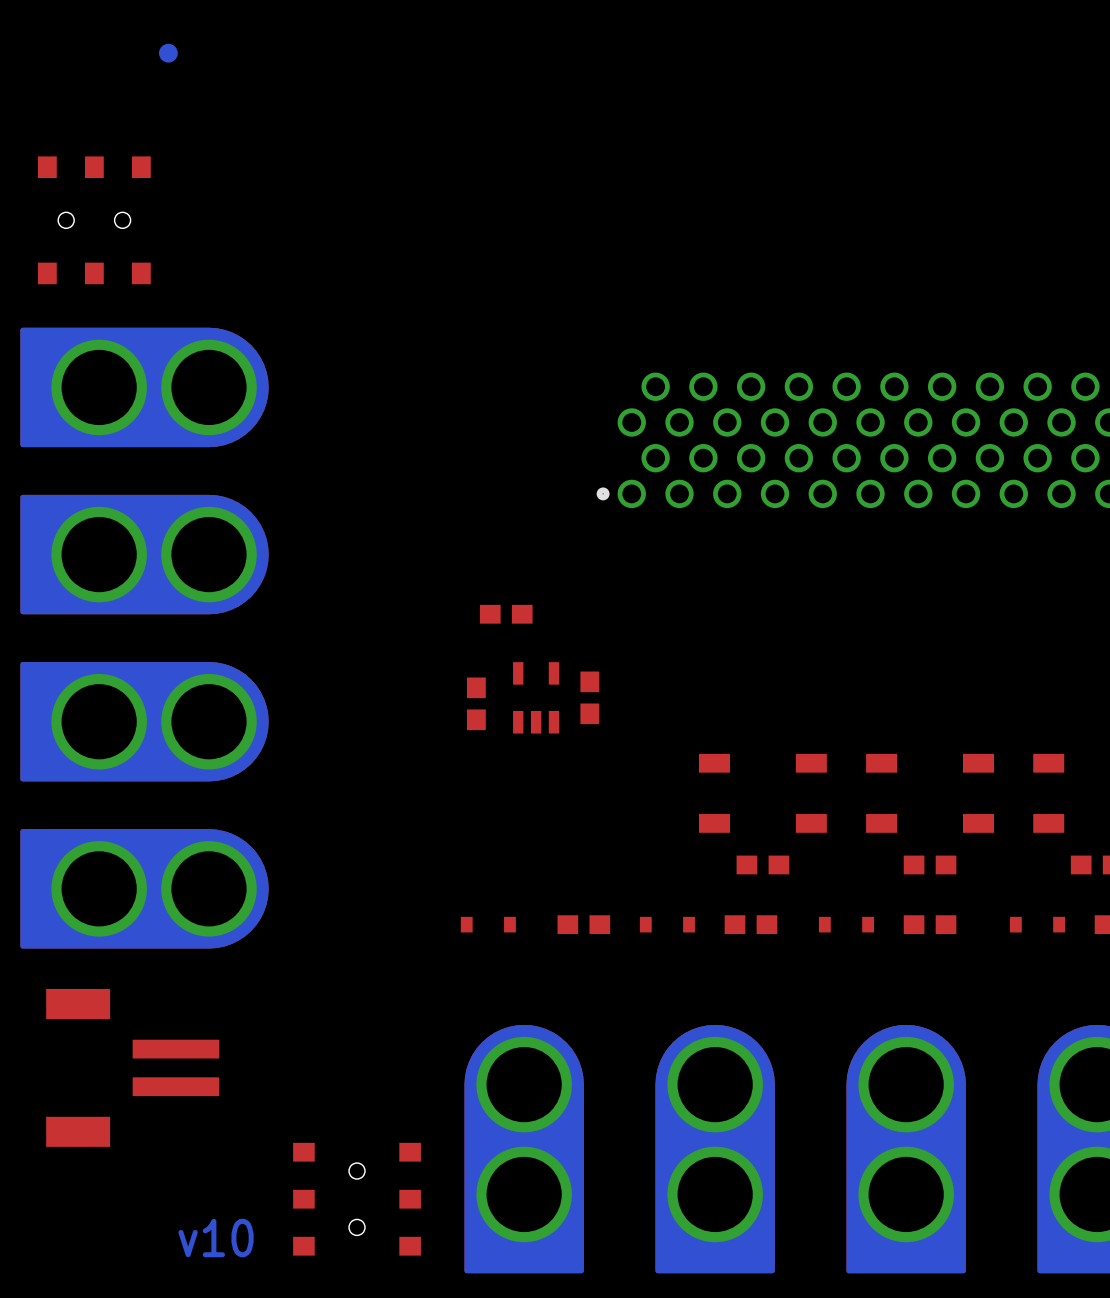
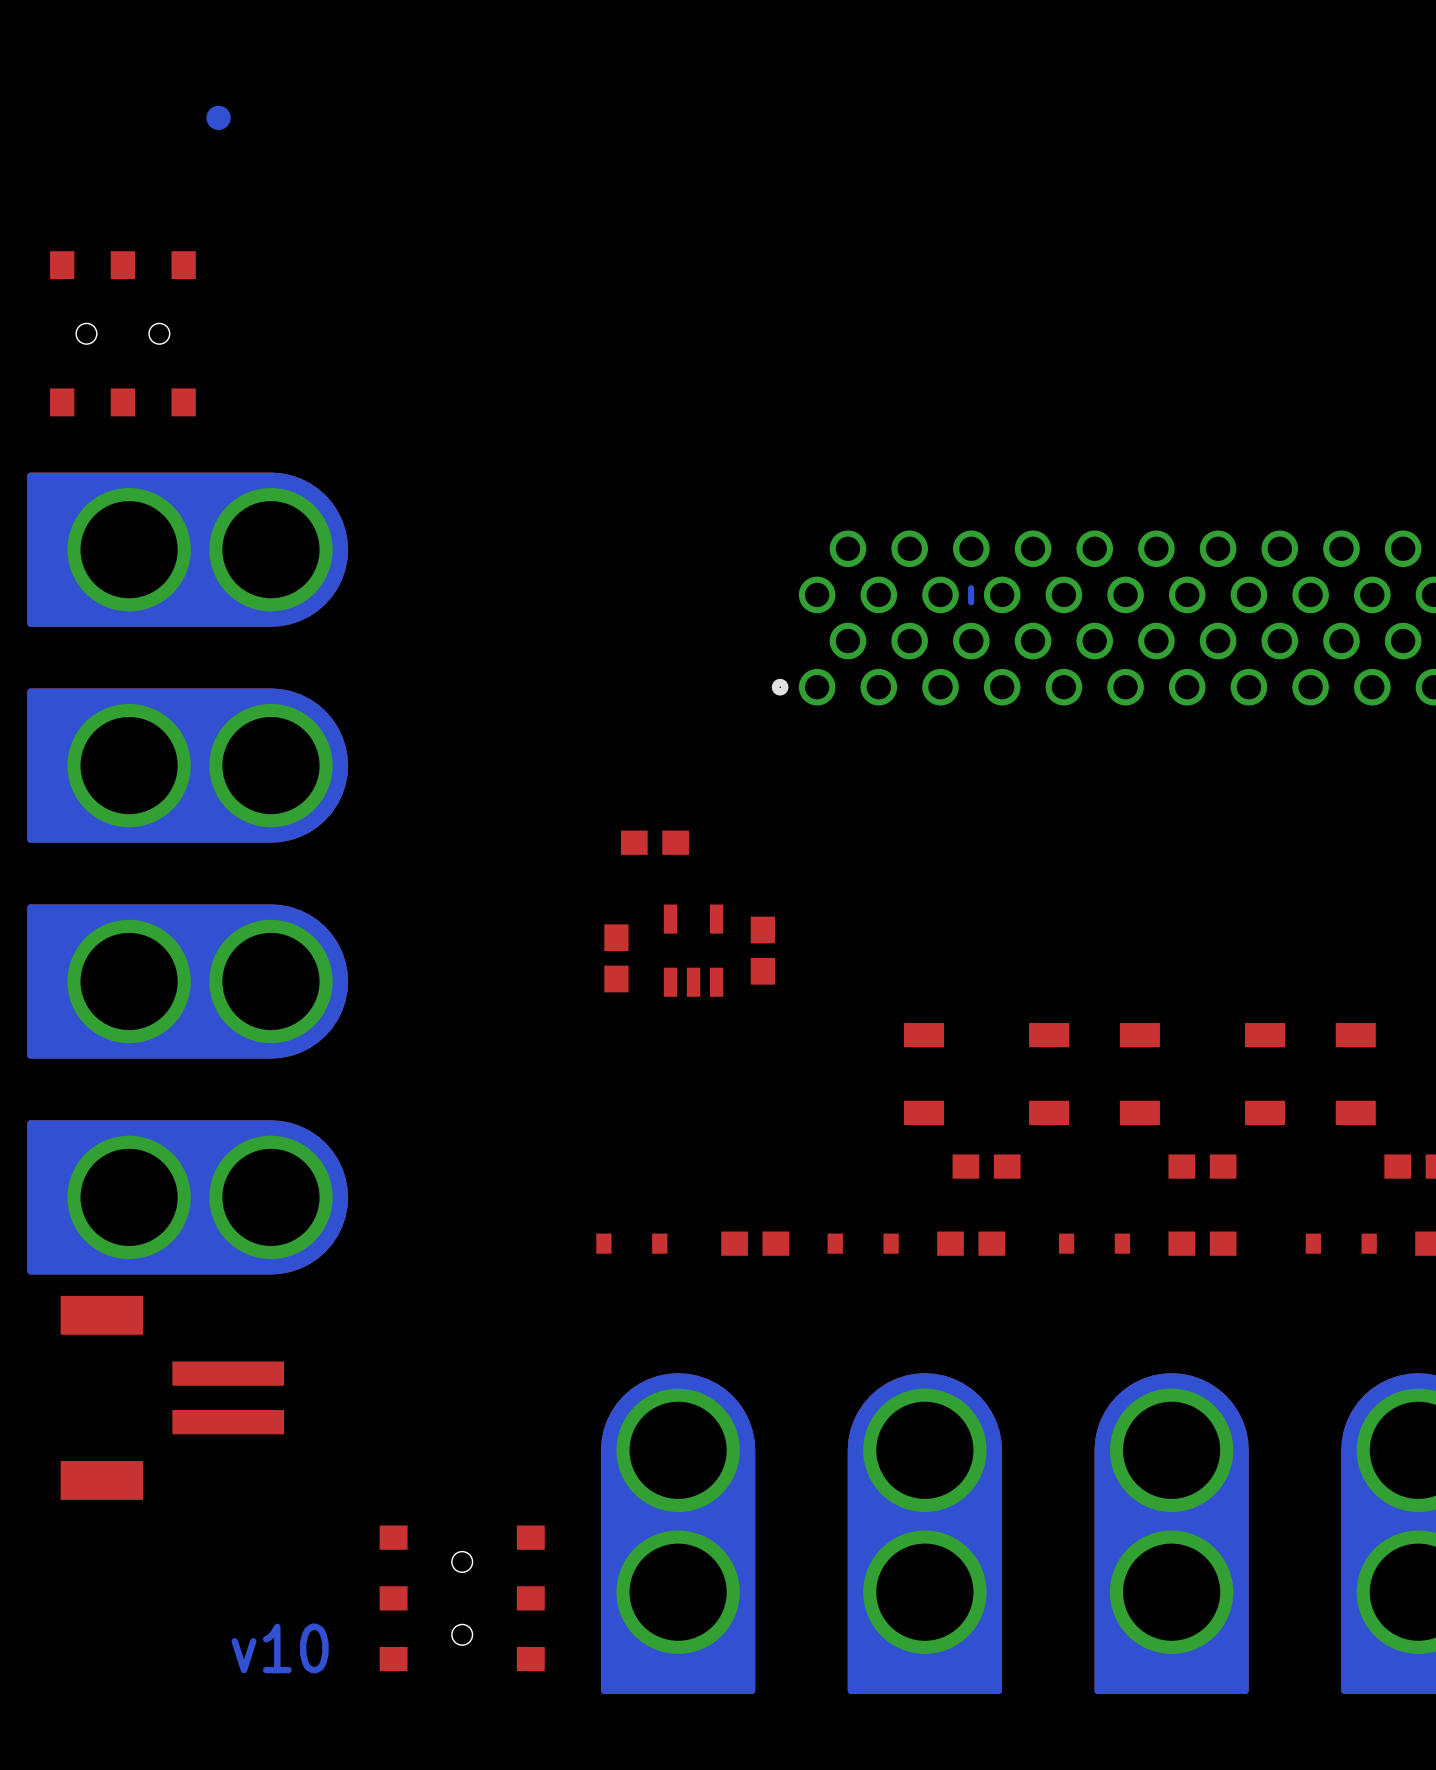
bottom track: none -> (971, 588) (971, 602)
part position: (132, 1067) -> (172, 1397)

